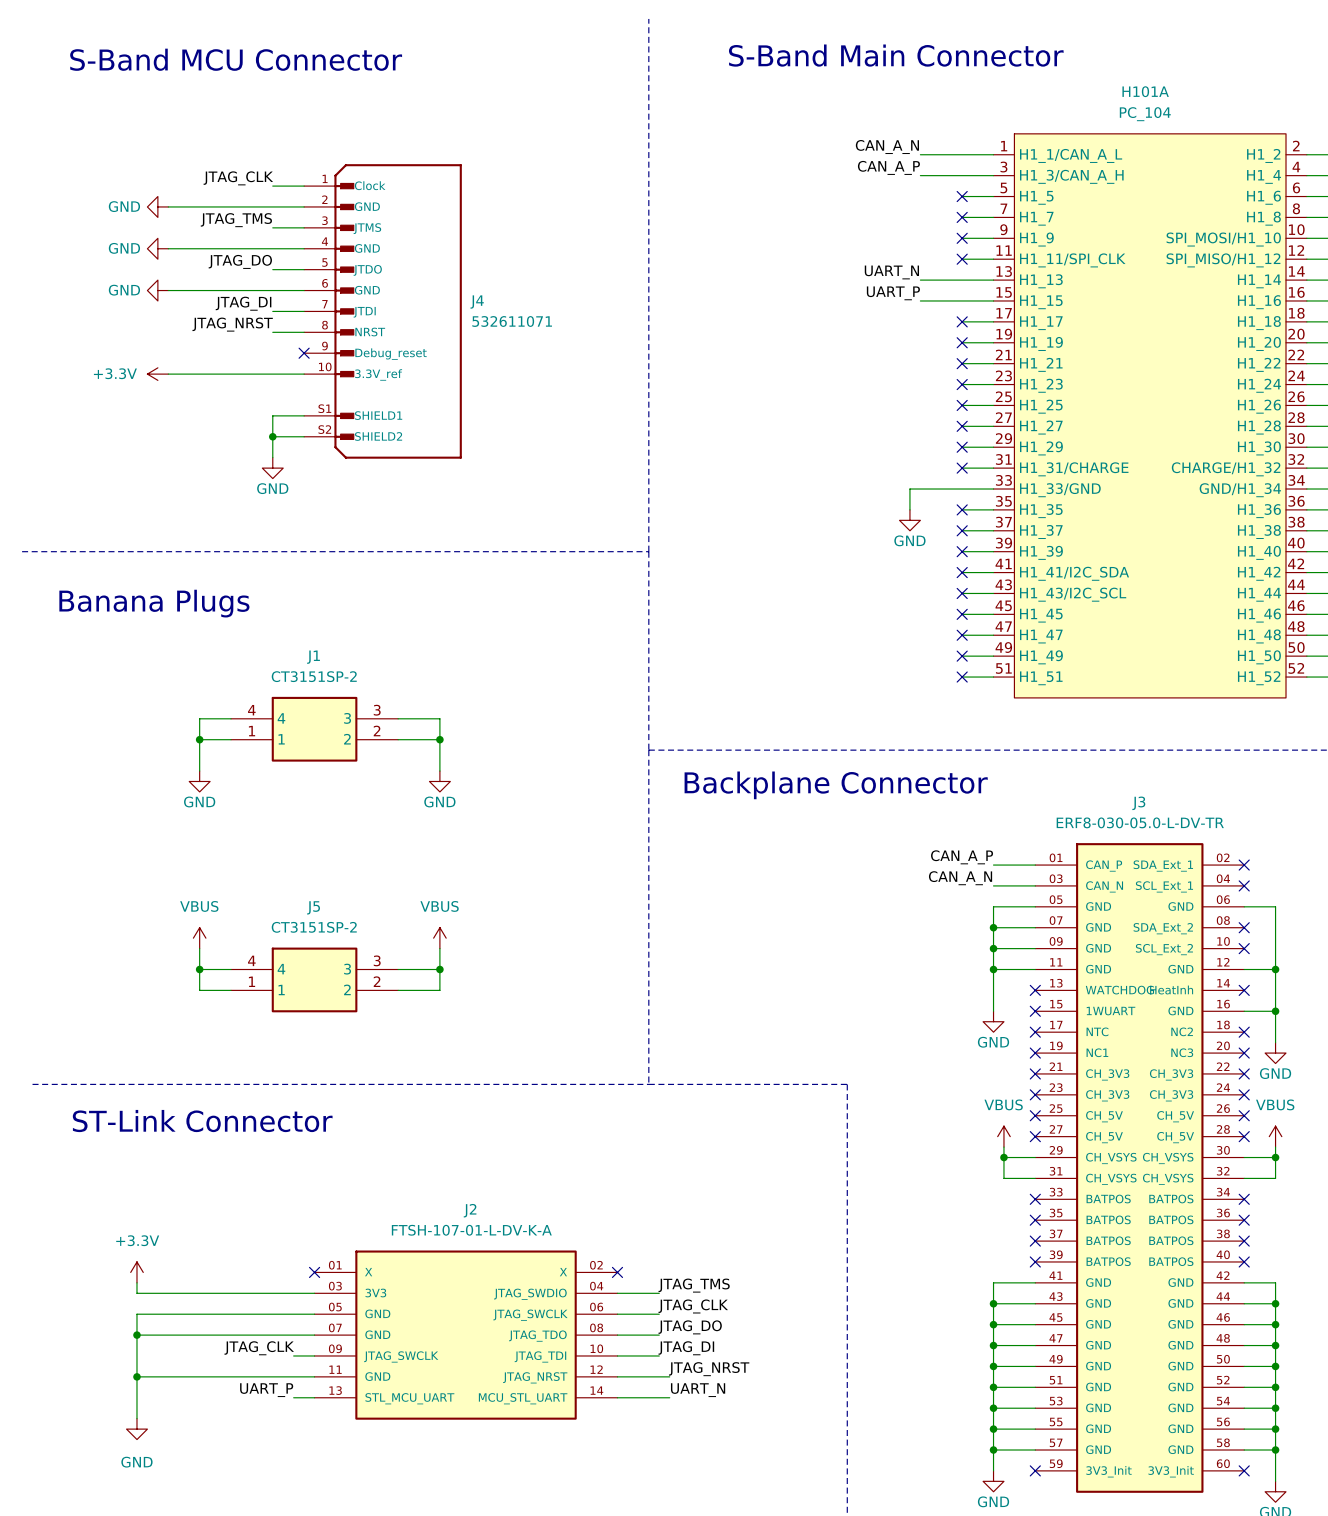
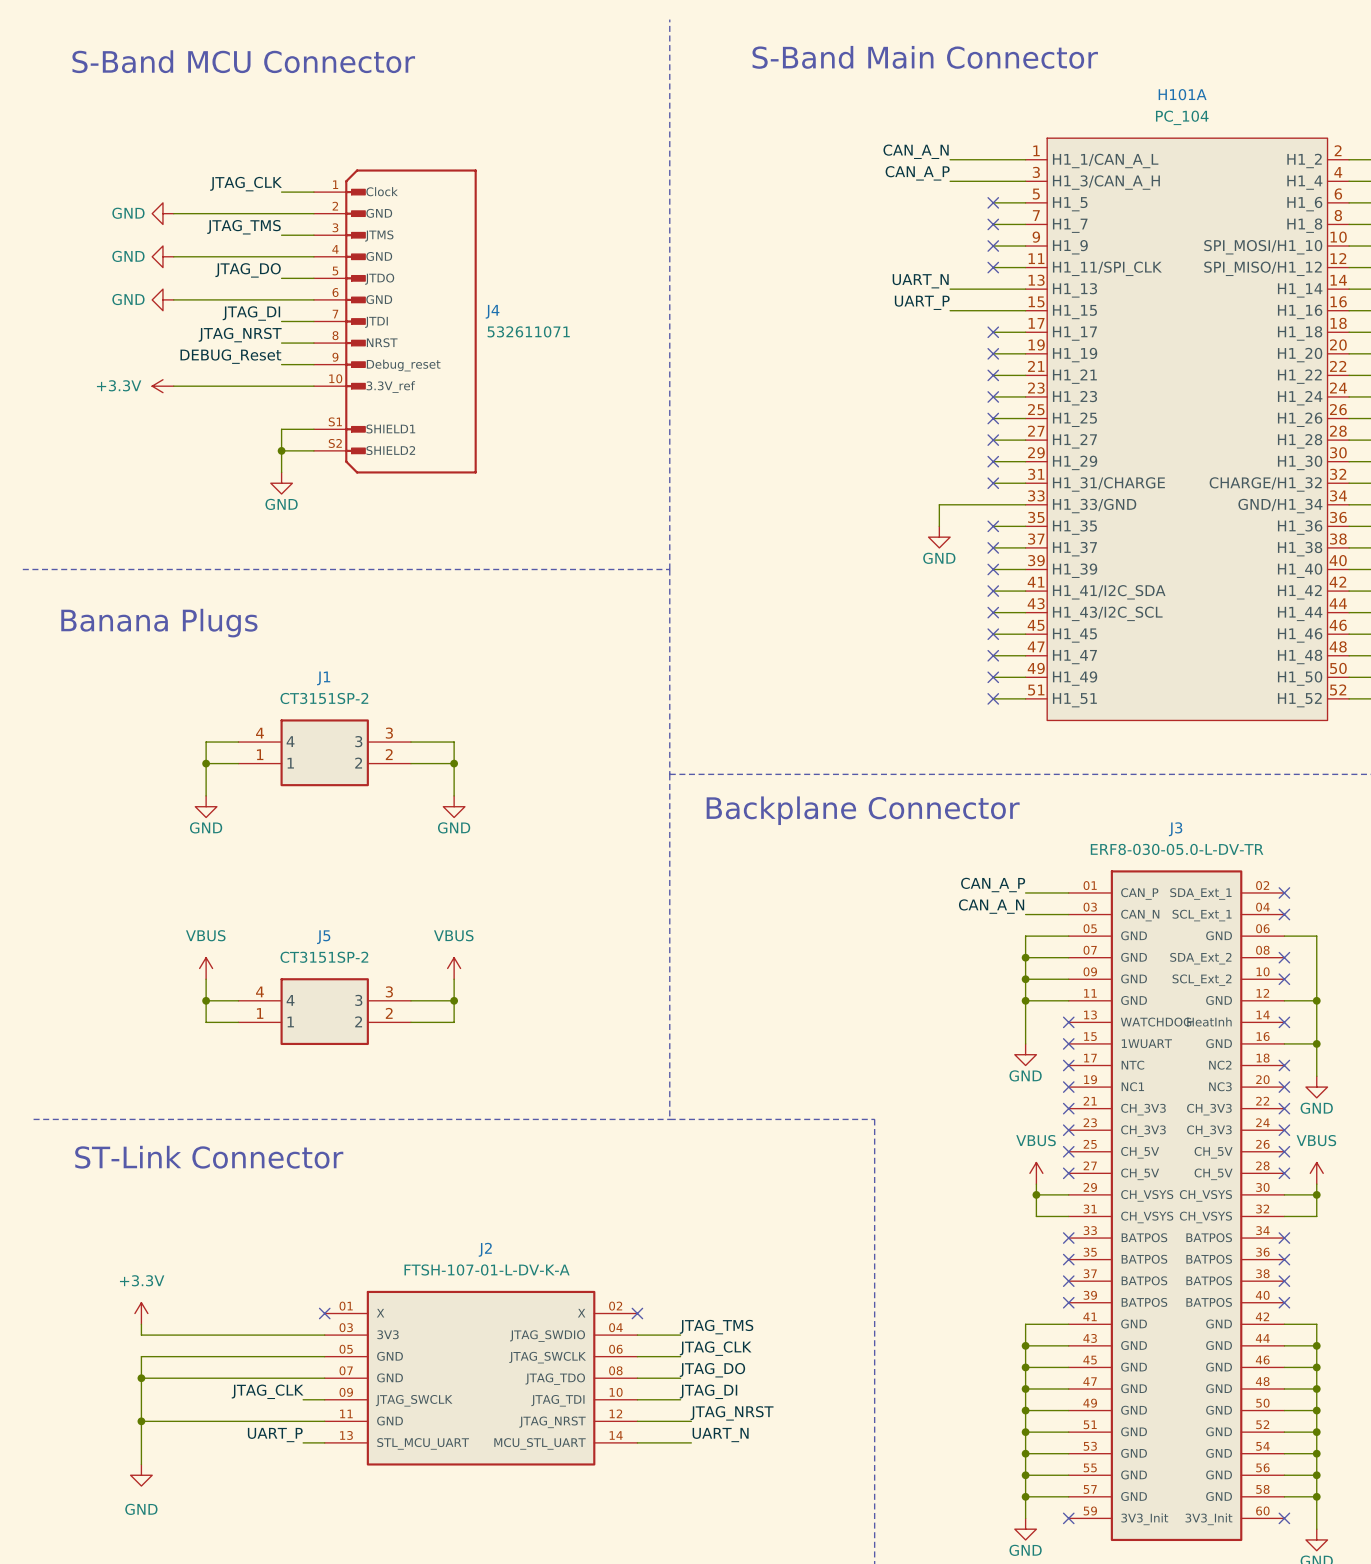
label: none -> DEBUG_Reset (230, 356)
wire: none -> (281, 364) (313, 364)
no-connect mark: (304, 353) -> none

